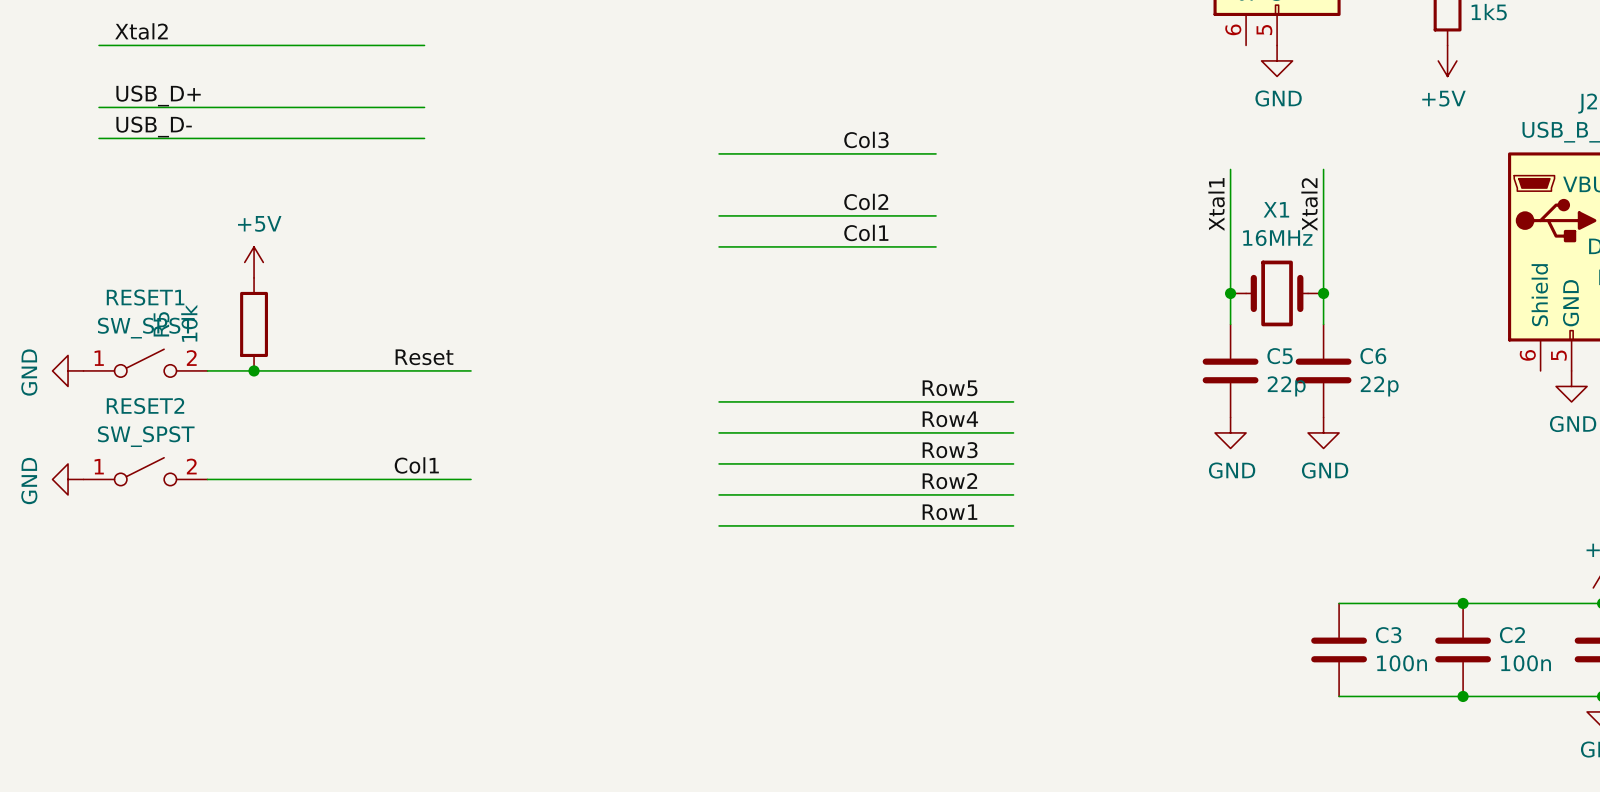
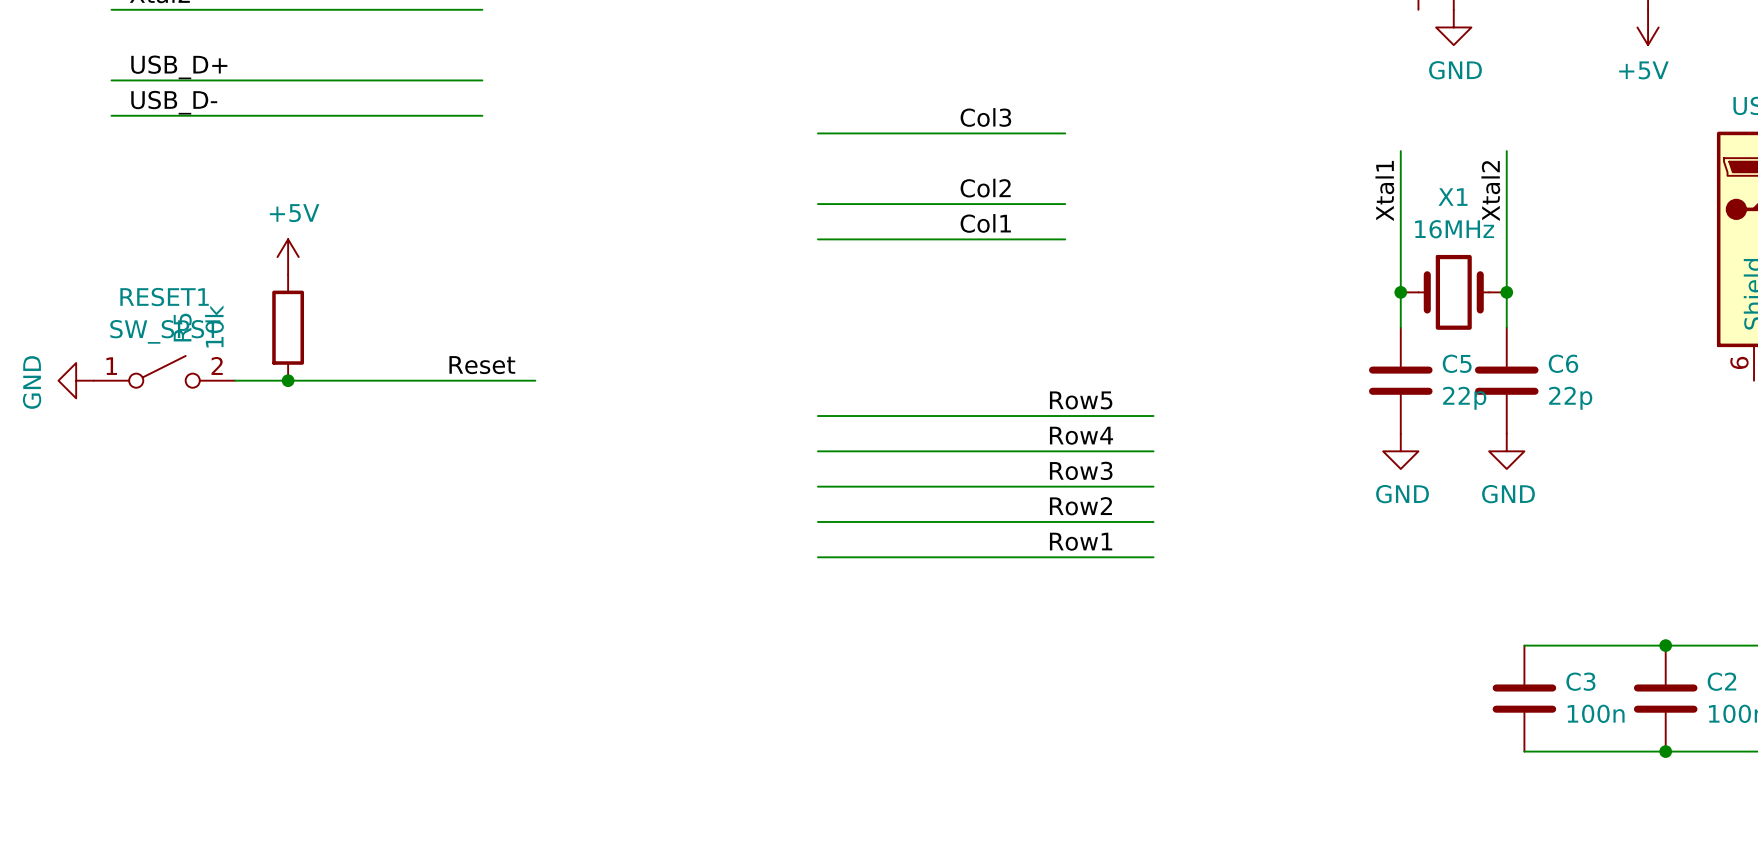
label: Col1 (416, 465) -> none
RESET2: SW_SPST (145, 471) -> none
power symbol: GND (68, 479) -> none
wire: (207, 479) (471, 479) -> none

